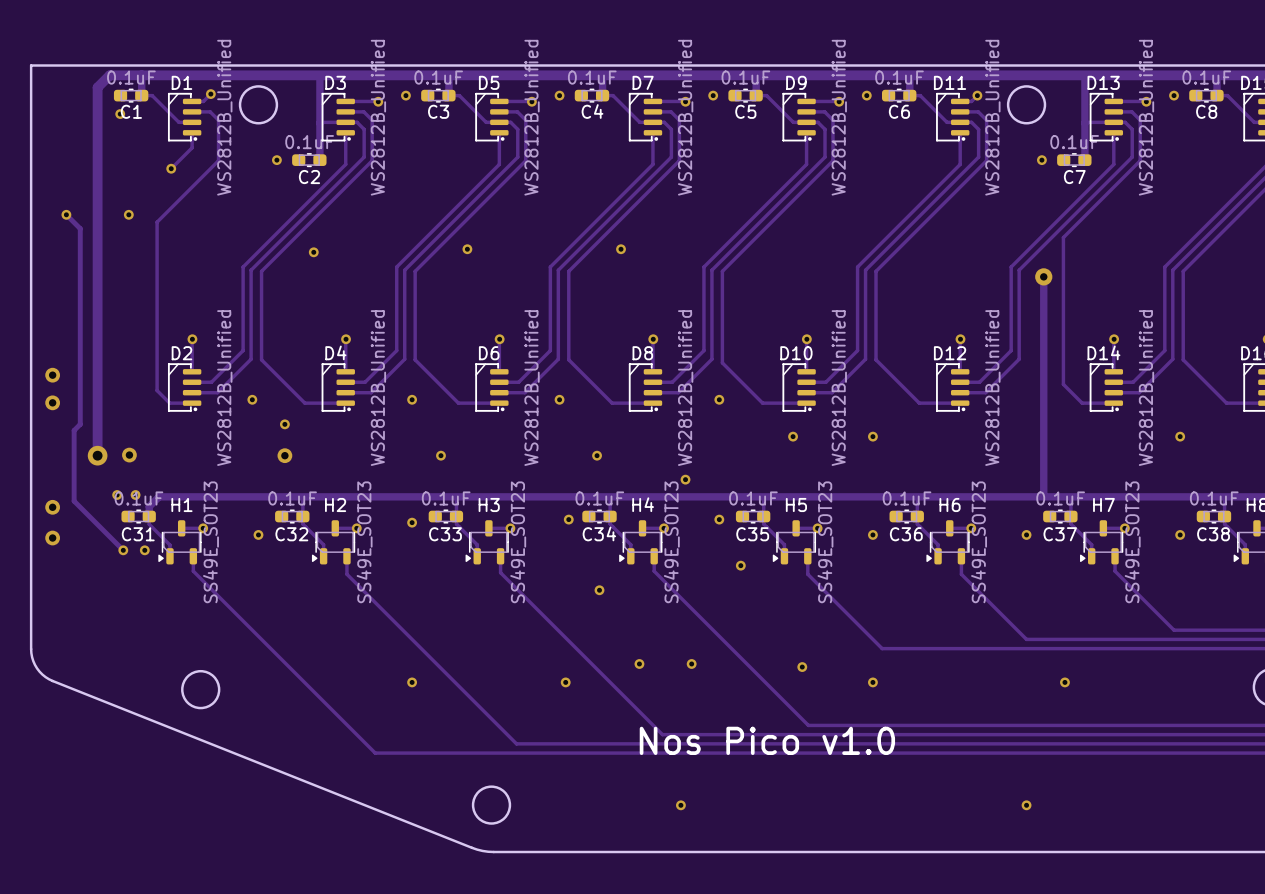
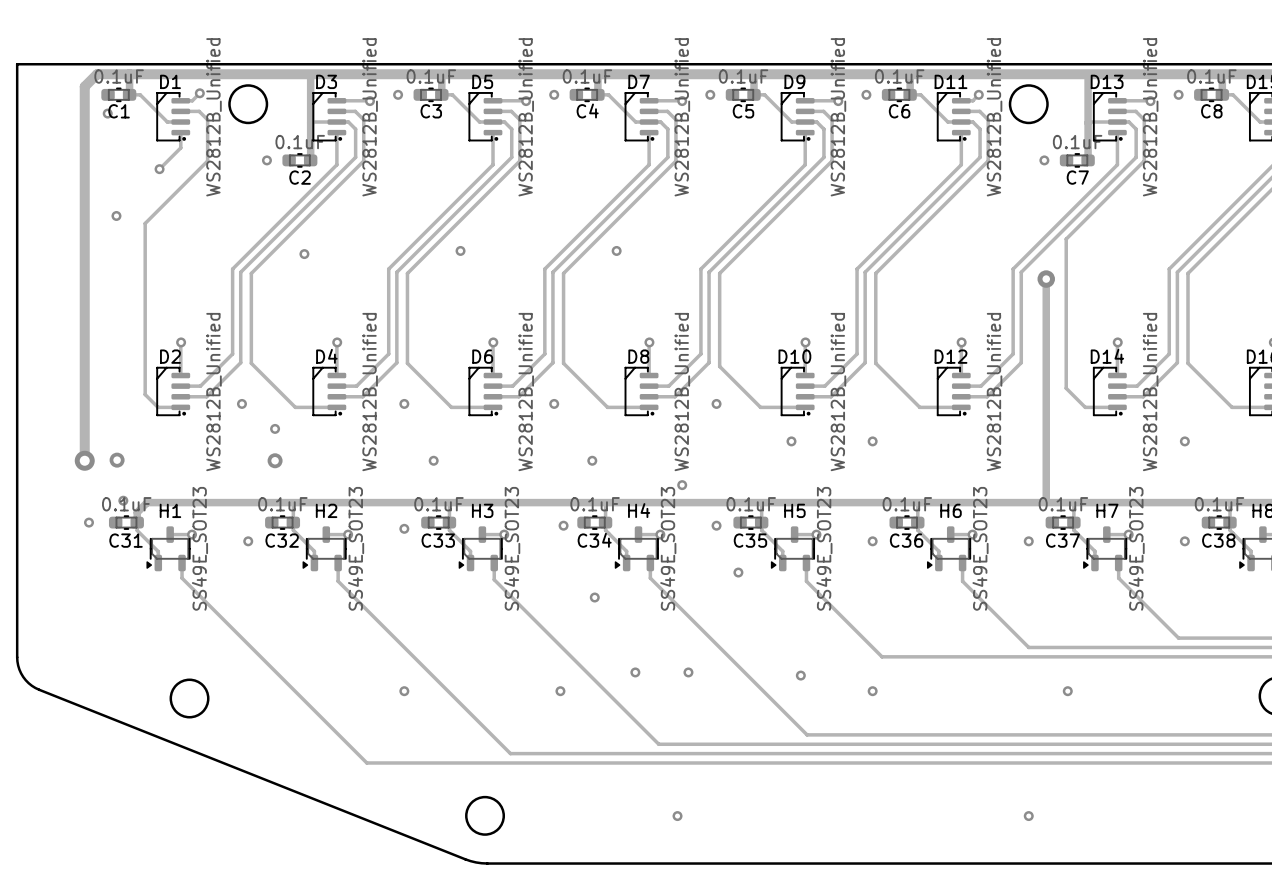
track: (66, 214) (80, 228) (80, 424) (74, 430) (74, 501) (123, 550) -> none
via: (66, 214) -> none
via: (52, 375) -> none
via: (52, 402) -> none
via: (117, 495) -> none
via: (52, 507) -> none
via: none -> (88, 522)
via: (52, 538) -> none
via: (123, 550) -> none
via: (144, 550) -> none
text: Nos Pico v1.0 (767, 740) -> none

